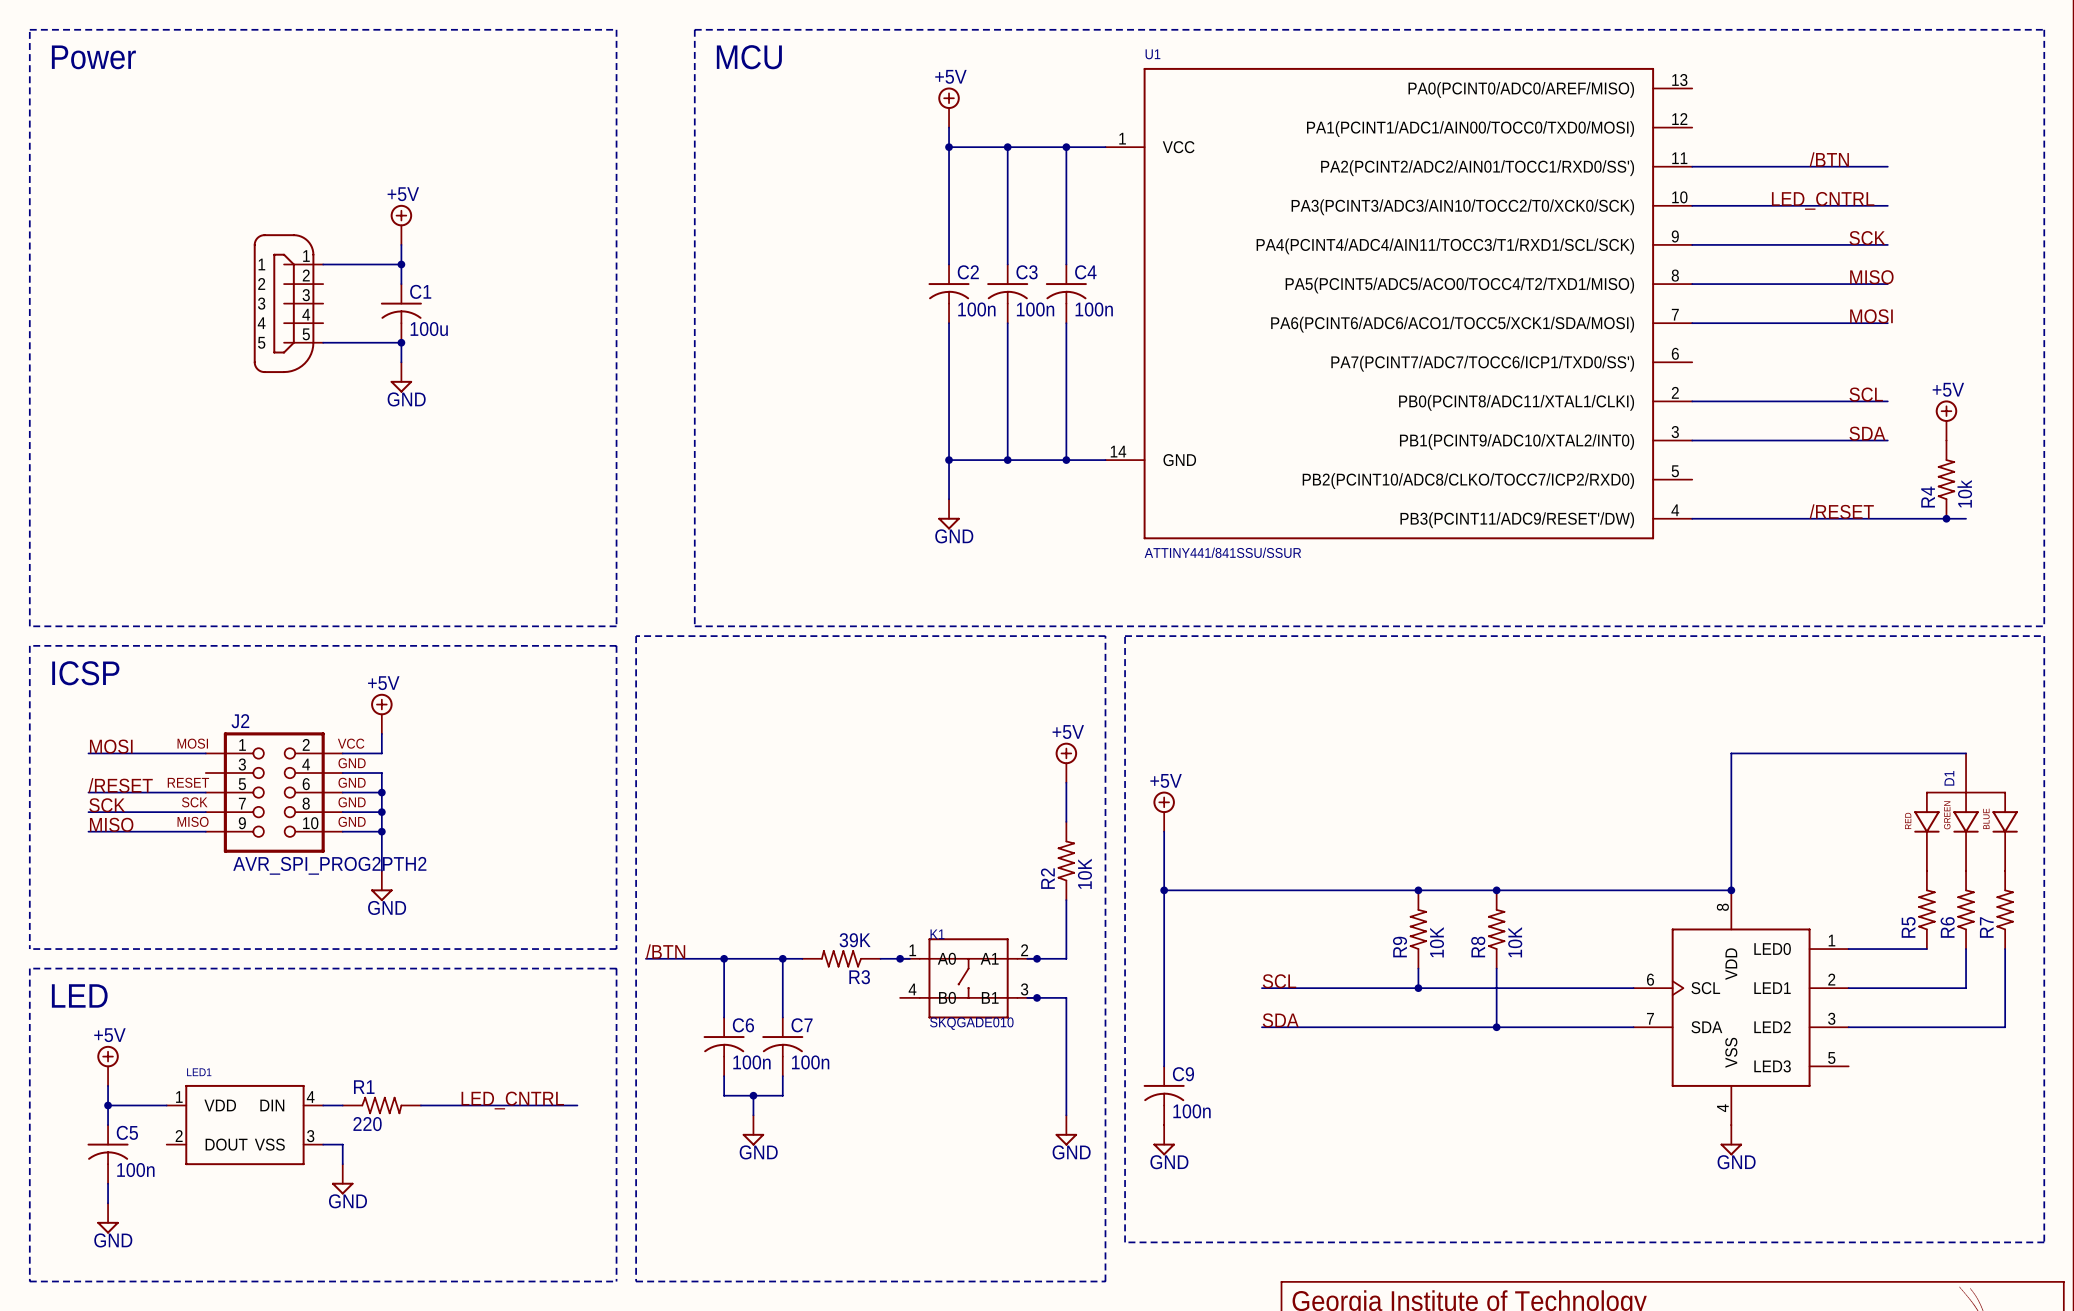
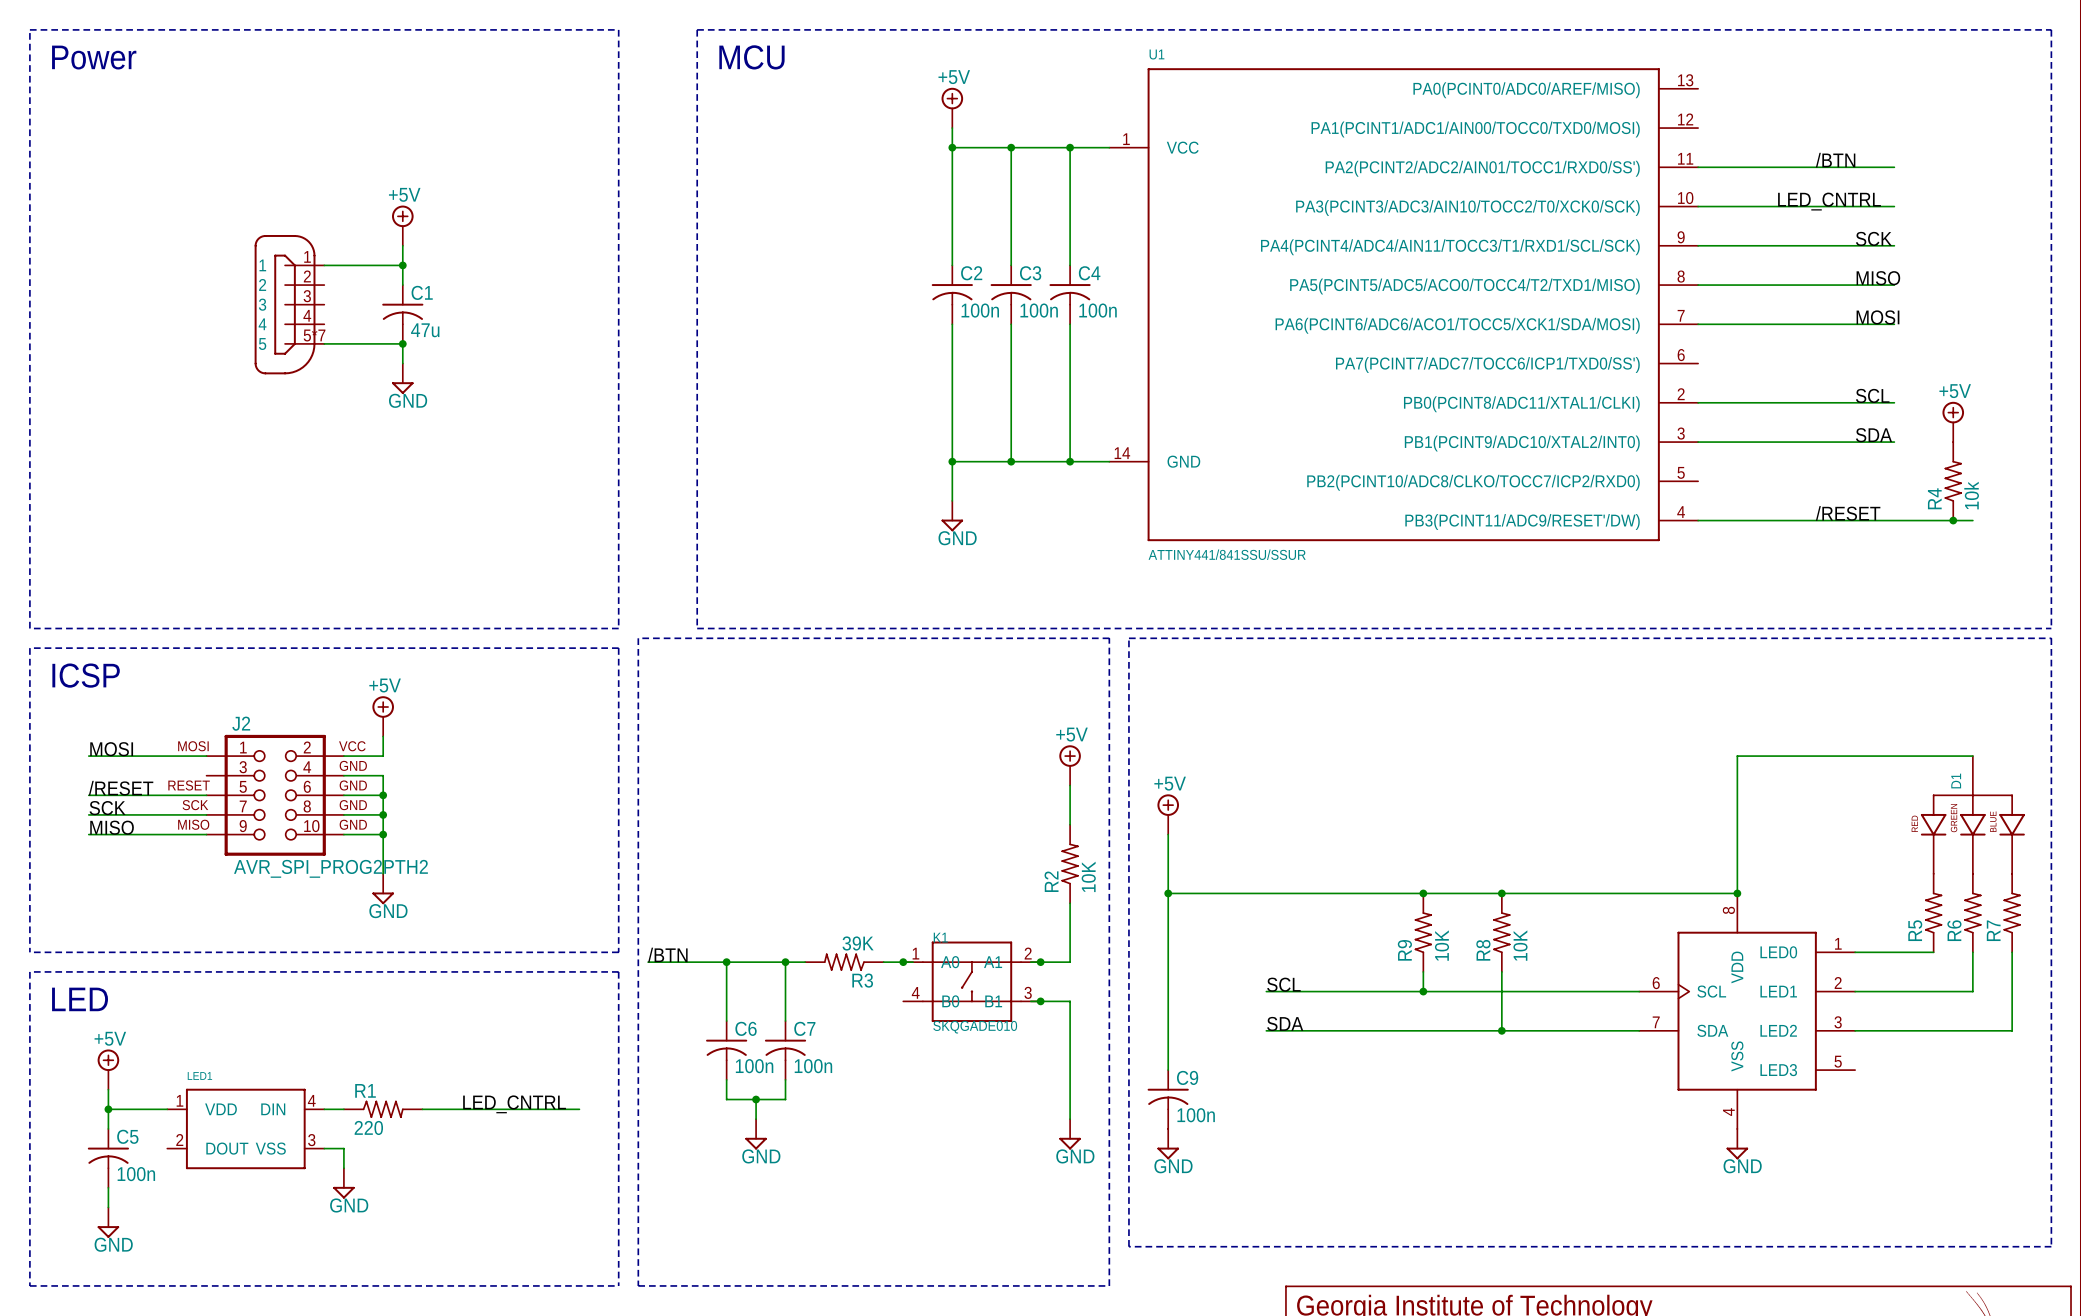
C1 value: 100u (429, 329) -> 47u (425, 330)
part pin number: 5 (306, 334) -> 5*7 (314, 335)

